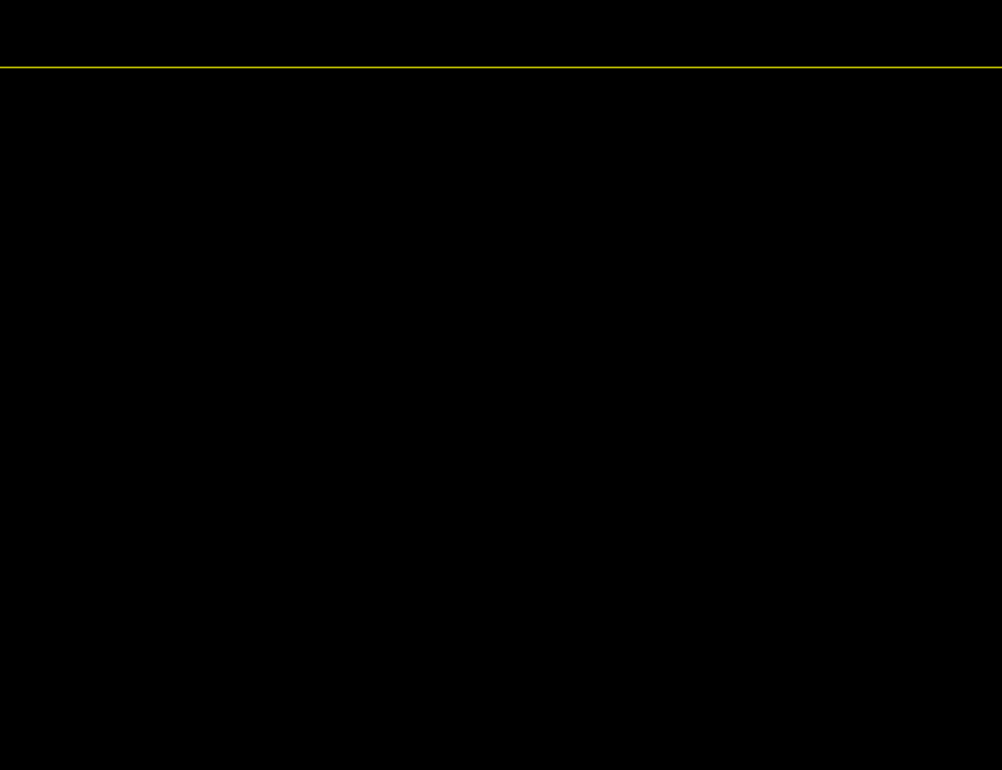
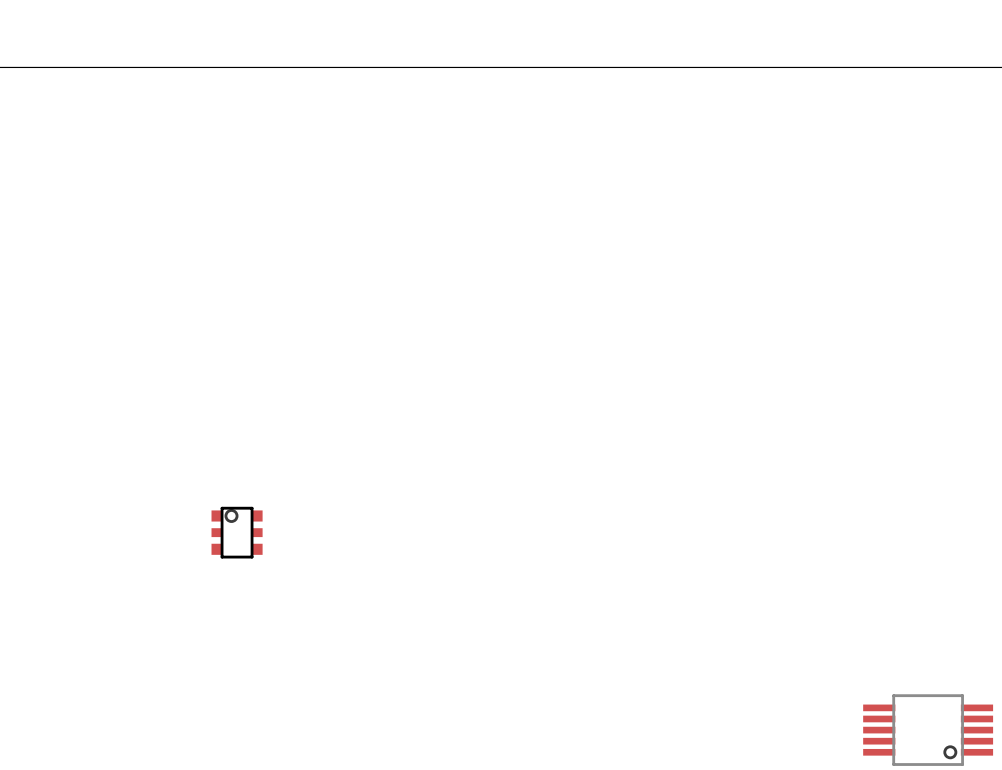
part: none -> (237, 532)
part: none -> (928, 730)

